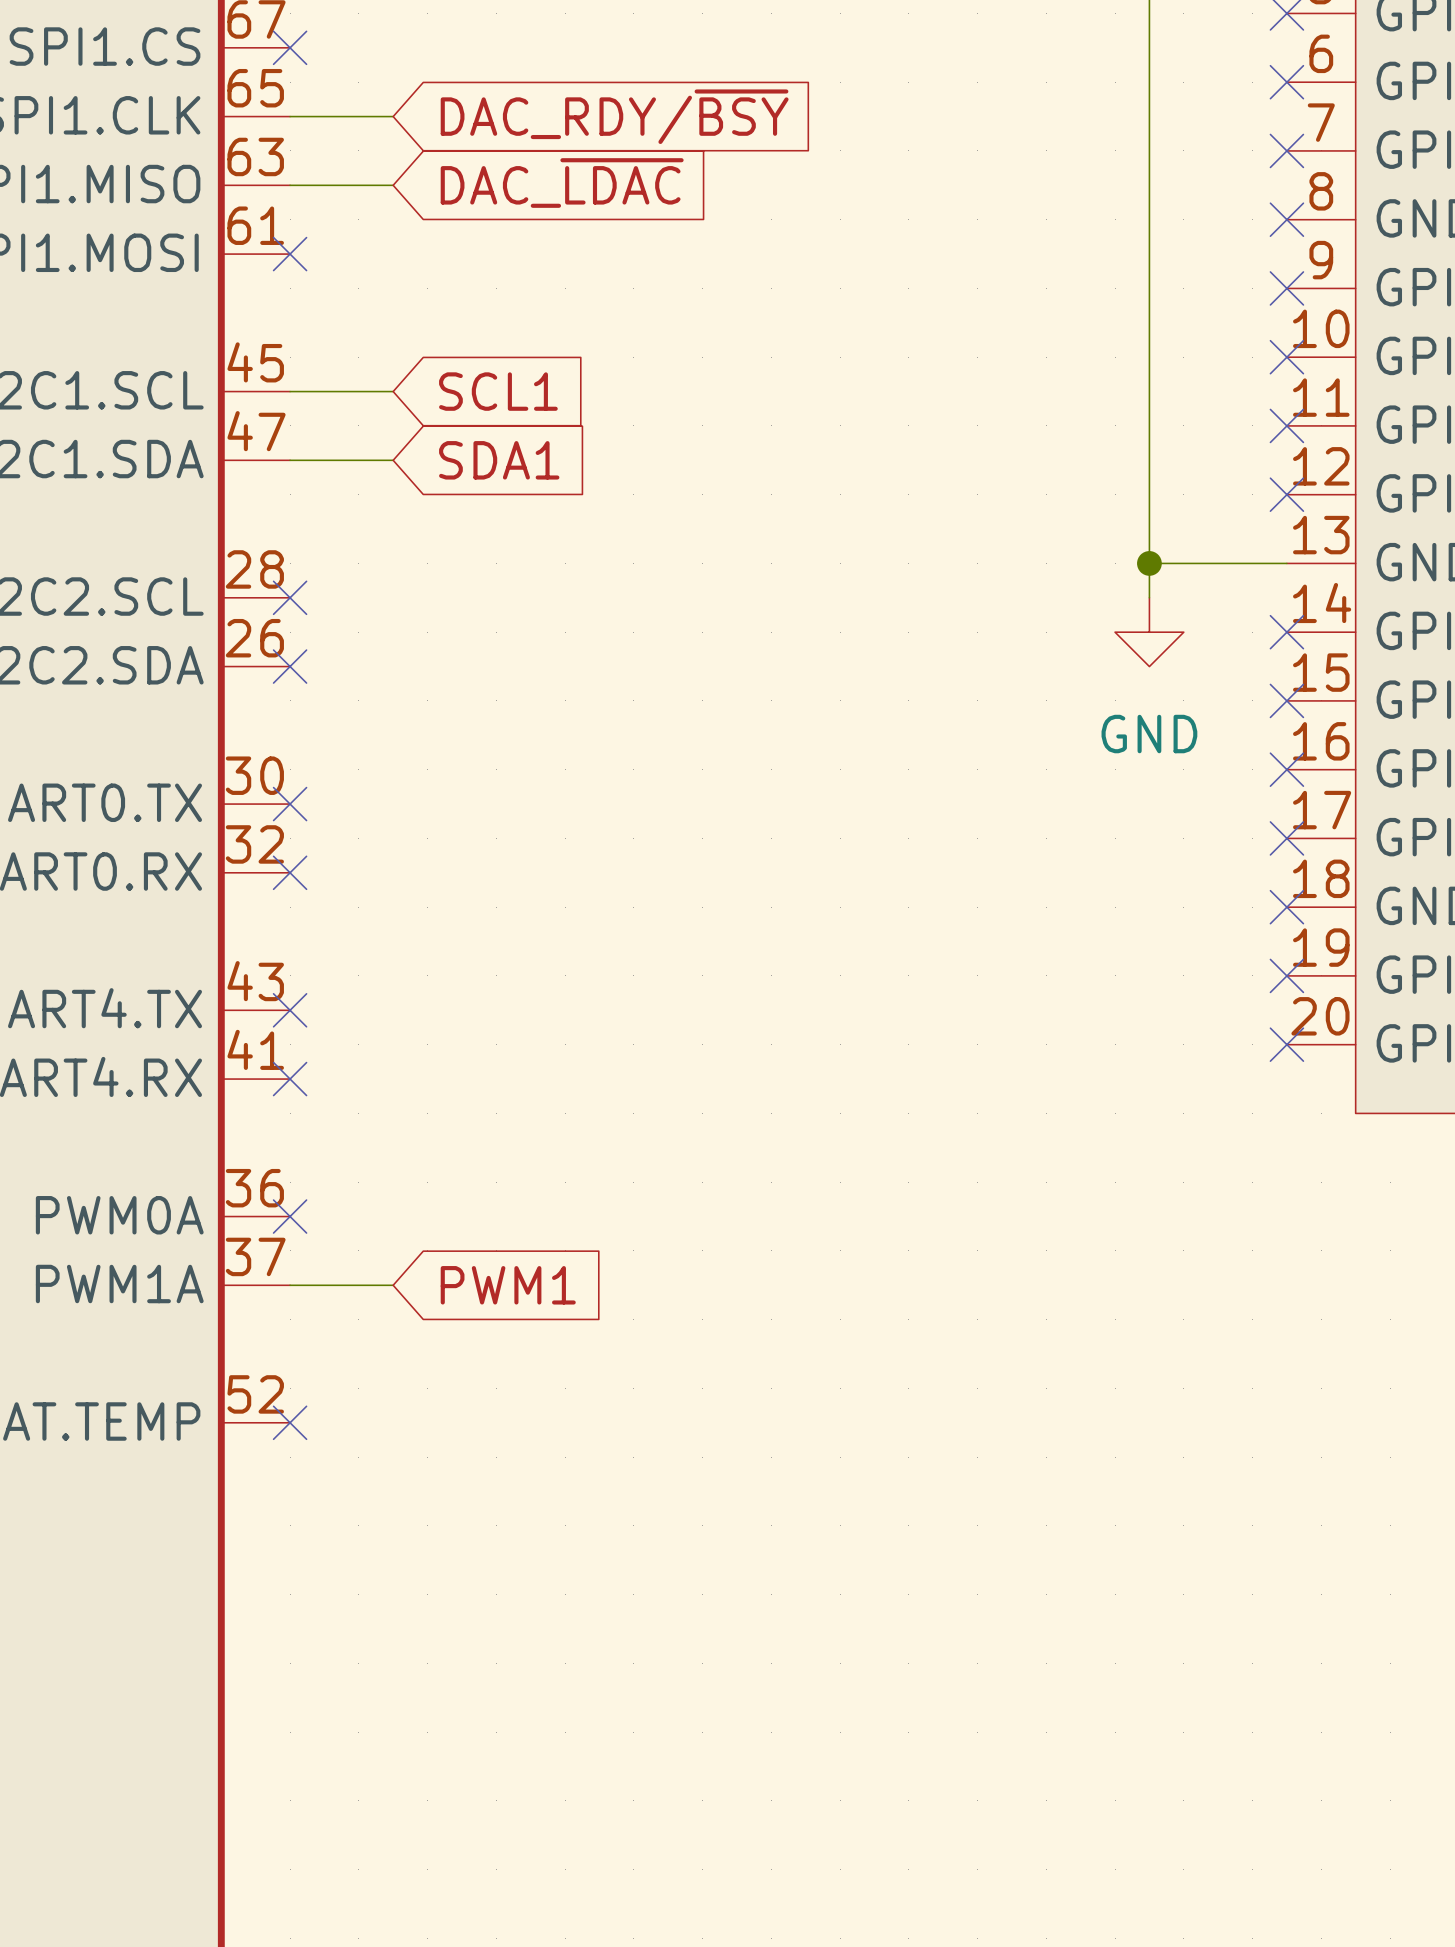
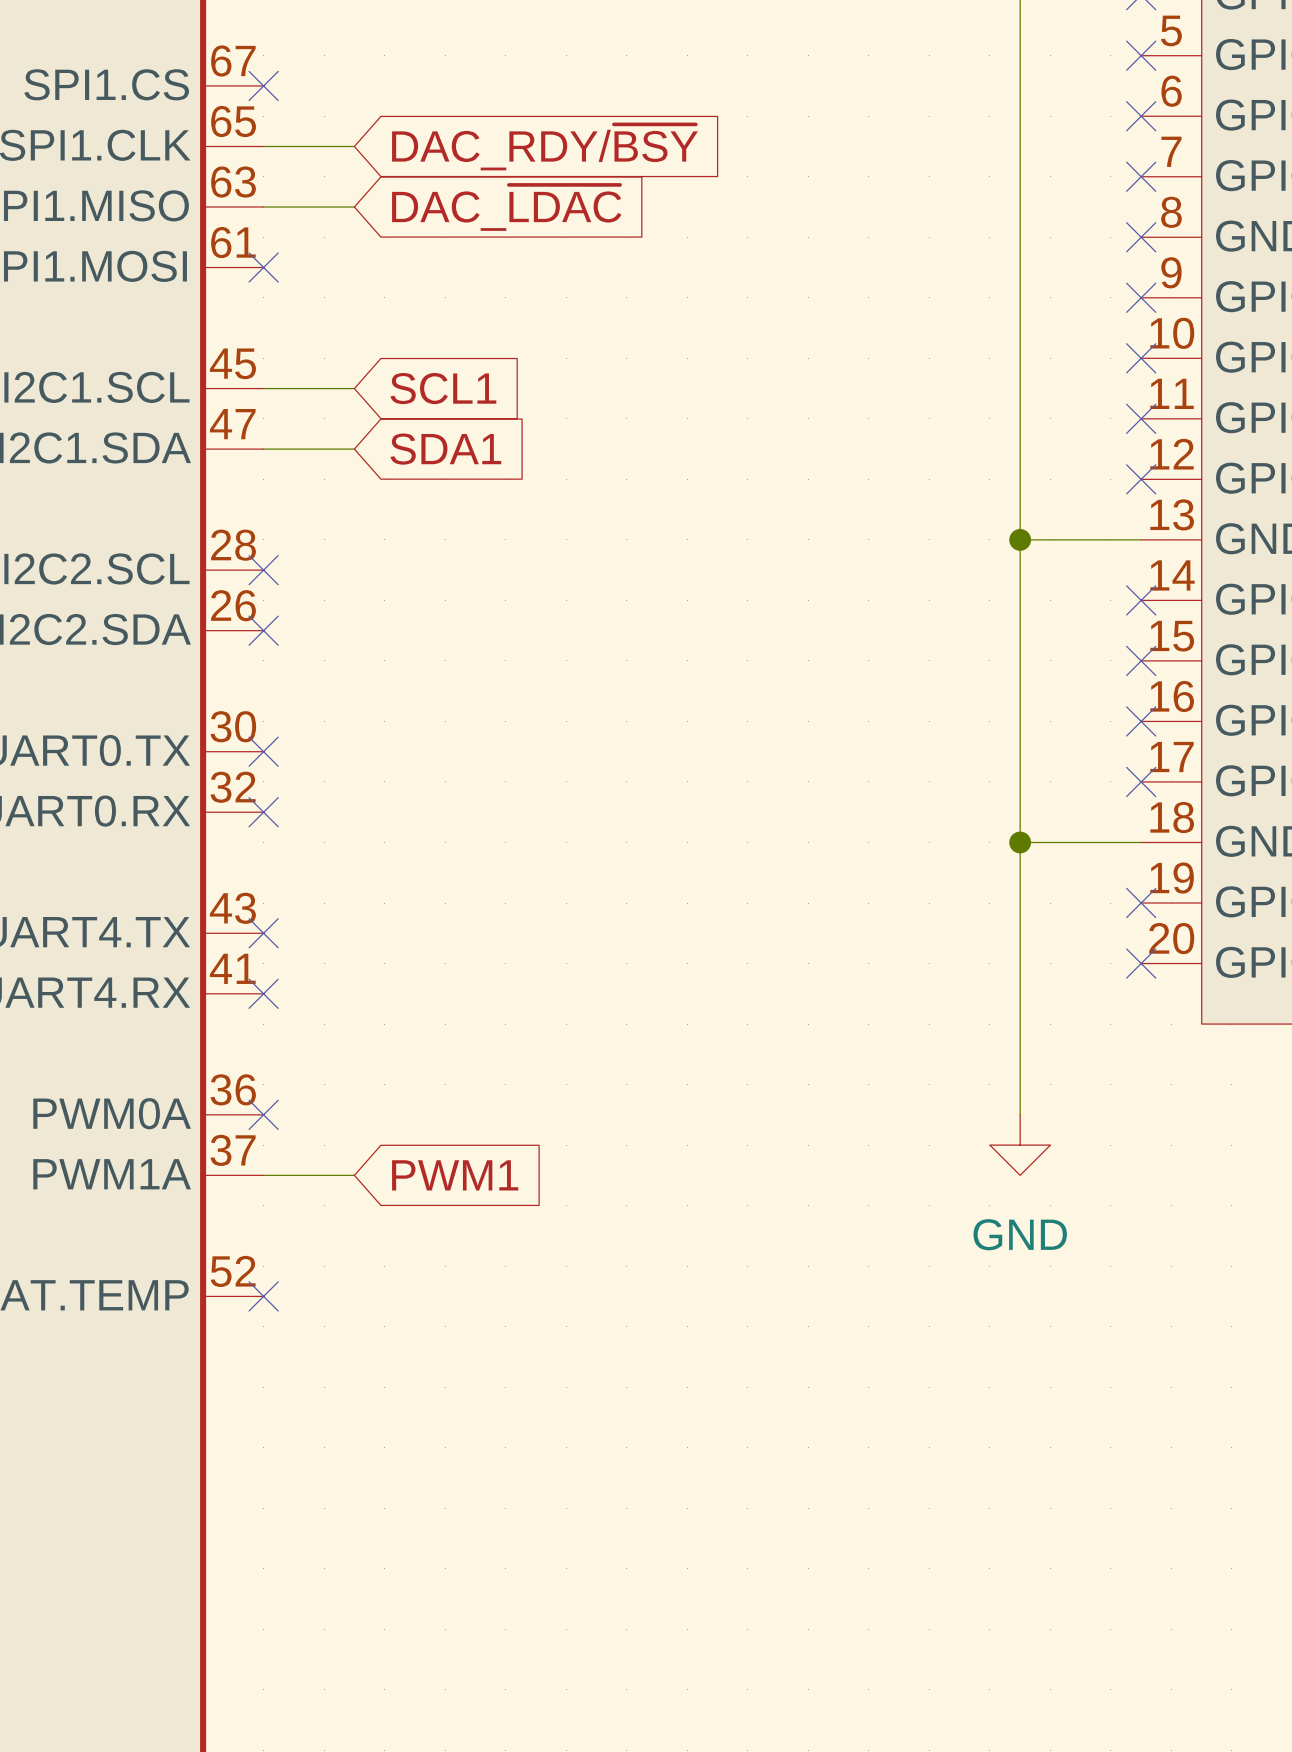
wire: none -> (1020, 570) (1020, 1114)
power symbol position: GND (1149, 632) -> GND (1020, 1145)
wire: none -> (1020, 842) (1141, 842)
junction: none -> (1020, 842)
no-connect mark: (1286, 907) -> none

